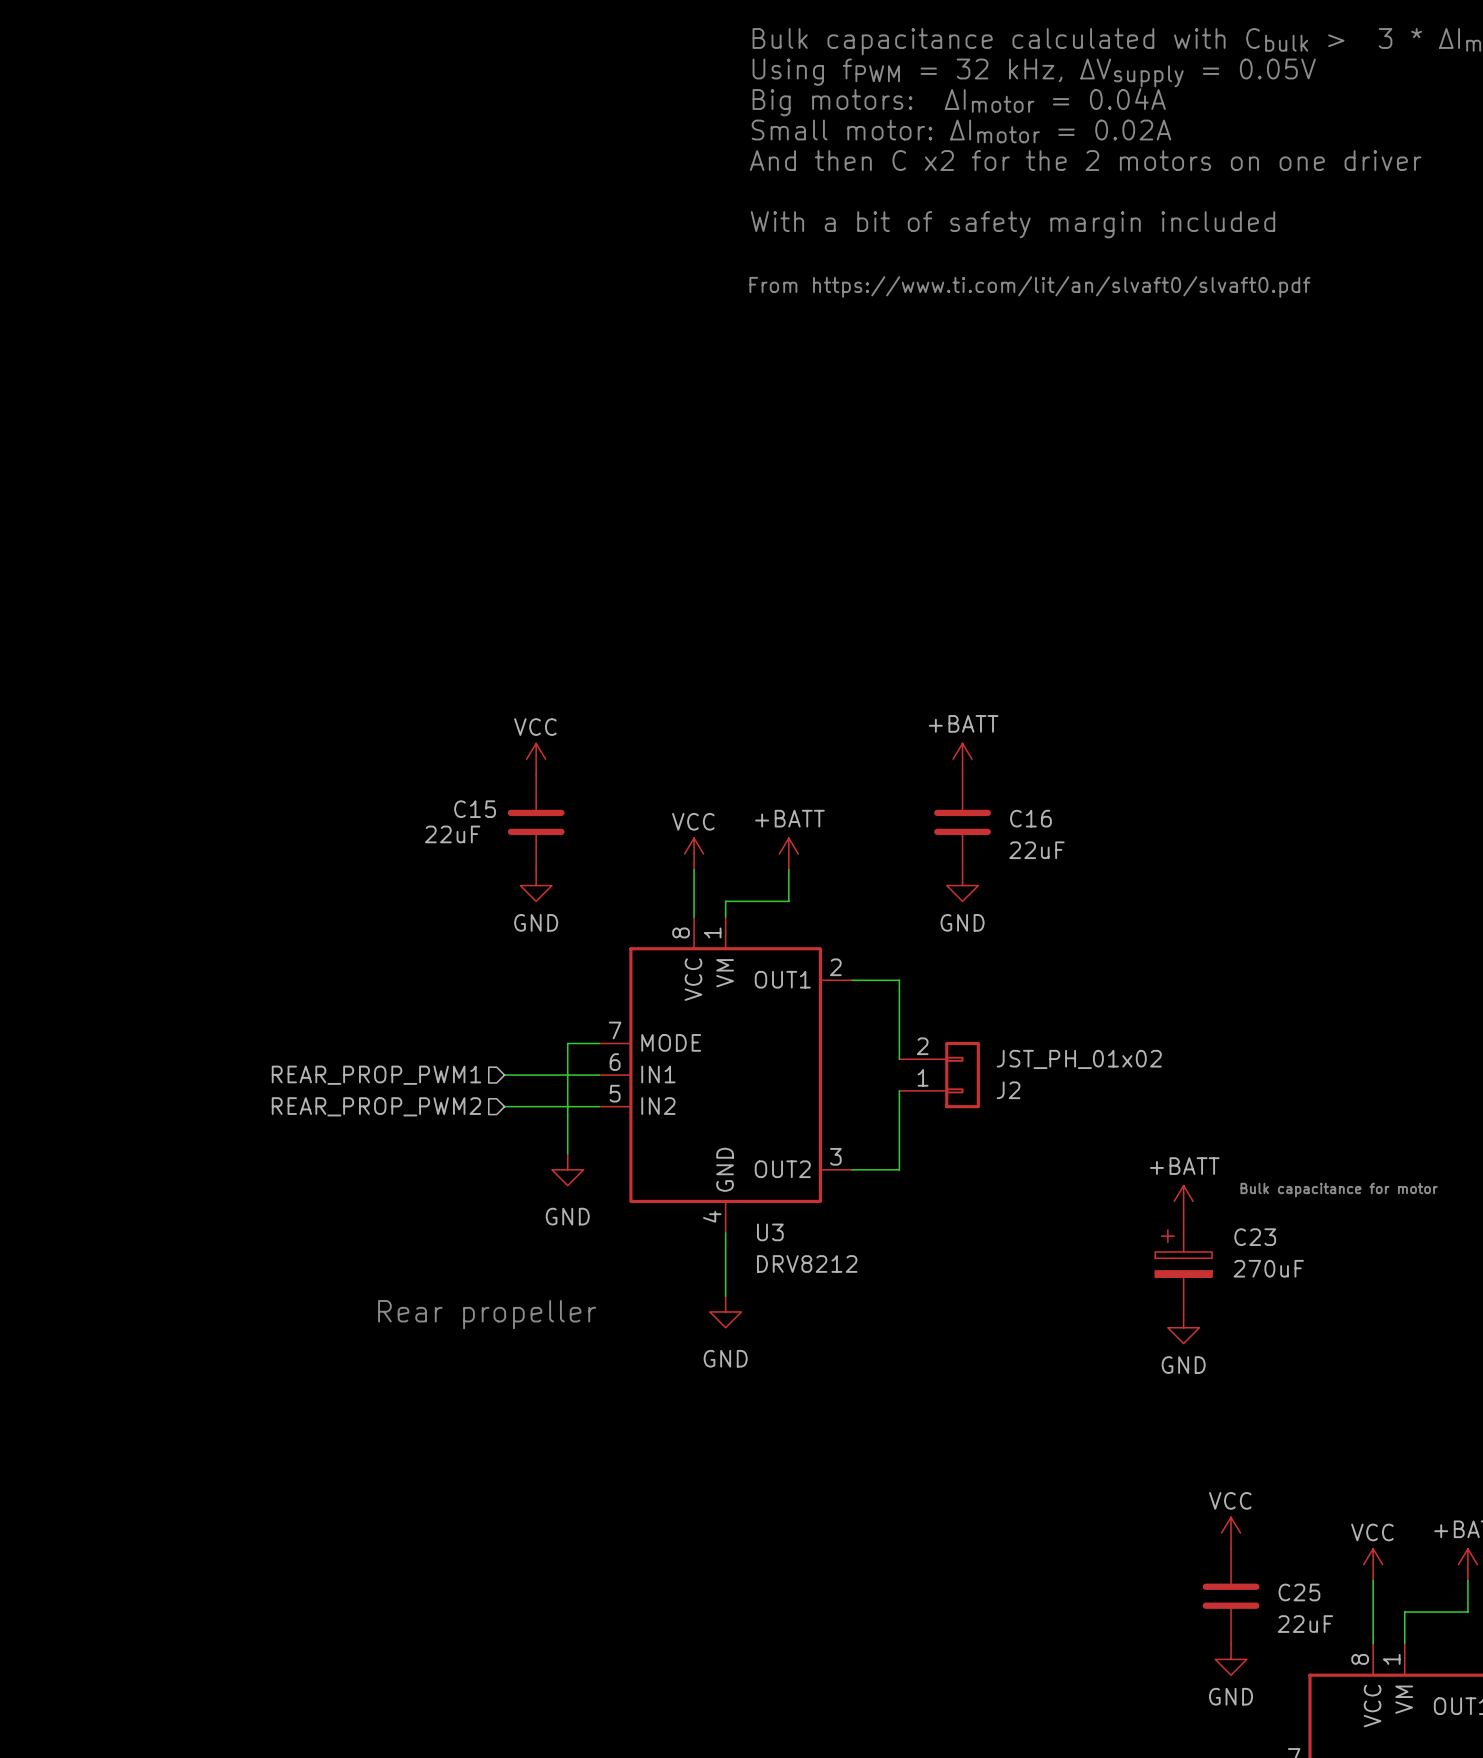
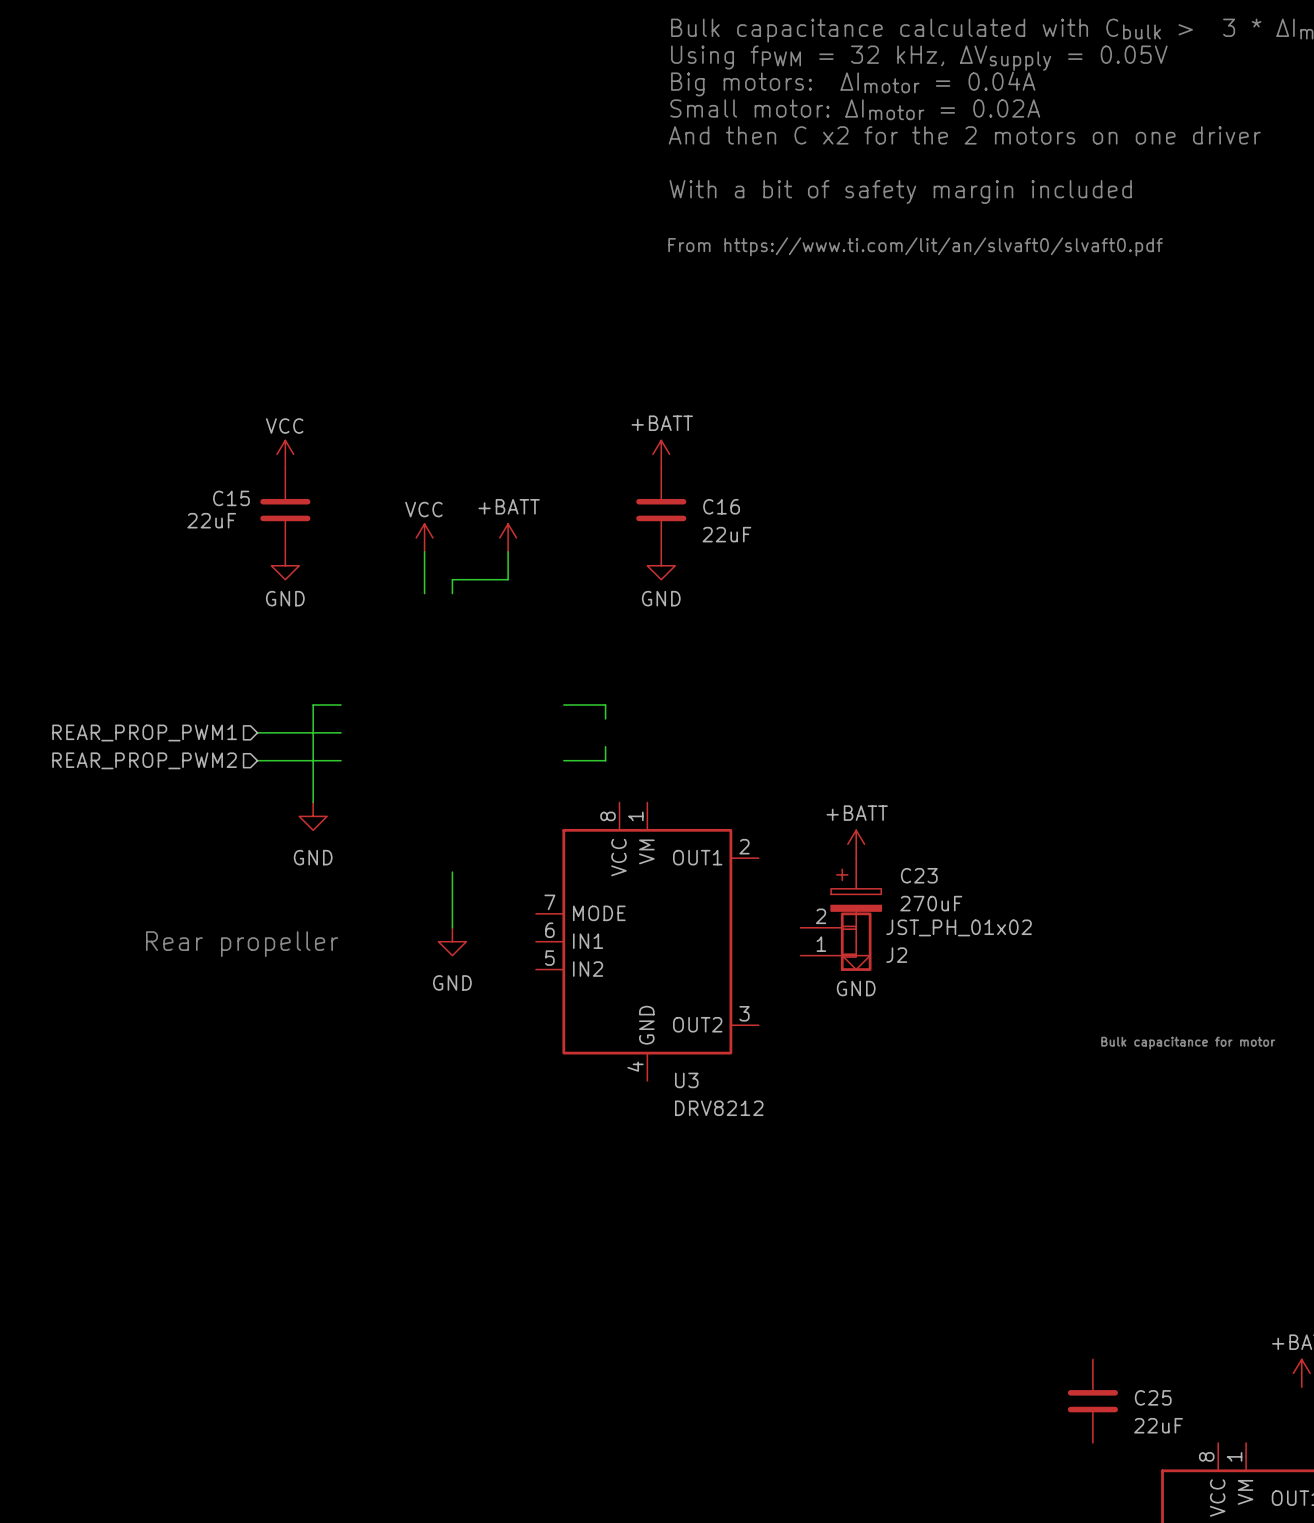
power symbol: none -> VCC (285, 454)
power symbol: none -> +BATT (661, 454)
power symbol: none -> +BATT (508, 537)
wire: none -> (424, 551) (424, 593)
wire: none -> (508, 551) (508, 579) (452, 579) (452, 593)
power symbol: none -> GND (285, 565)
power symbol: none -> GND (661, 565)
power symbol position: VCC (536, 759) -> VCC (424, 537)
power symbol: +BATT (962, 759) -> none
wire: none -> (341, 705) (313, 705) (313, 802)
wire: none -> (563, 705) (605, 705) (605, 718)
C15 position: (536, 822) -> (285, 510)
C16 position: (962, 822) -> (661, 510)
hierarchical label: none -> REAR_PROP_PWM1 (144, 733)
wire: none -> (257, 732) (341, 732)
wire: none -> (605, 746) (605, 760) (563, 760)
power symbol: VCC (694, 853) -> none
power symbol: +BATT (788, 853) -> none
hierarchical label: none -> REAR_PROP_PWM2 (144, 760)
wire: (694, 869) (694, 917) -> none
wire: (788, 869) (788, 901) (725, 901) (725, 917) -> none
power symbol: GND (536, 885) -> none
power symbol: GND (962, 885) -> none
power symbol: none -> GND (313, 816)
power symbol: none -> +BATT (856, 844)
wire: (852, 980) (899, 980) (899, 1059) -> none
wire: none -> (452, 872) (452, 927)
wire: (599, 1043) (567, 1043) (567, 1154) -> none
hierarchical label: REAR_PROP_PWM1 (376, 1075) -> none
wire: (504, 1075) (599, 1075) -> (257, 760) (341, 760)
power symbol: none -> GND (452, 941)
text: none -> Rear propeller (242, 944)
wire: (899, 1090) (899, 1169) (852, 1169) -> none
power symbol: none -> GND (856, 955)
hierarchical label: REAR_PROP_PWM2 (376, 1106) -> none
wire: (504, 1106) (599, 1106) -> none
power symbol: GND (567, 1169) -> none
power symbol: +BATT (1183, 1201) -> none
wire: (725, 1233) (725, 1296) -> none
C23 position: (1183, 1264) -> (856, 899)
power symbol: GND (725, 1311) -> none
text: Rear propeller (487, 1314) -> none
power symbol: GND (1183, 1327) -> none
power symbol: VCC (1231, 1533) -> none
power symbol: VCC (1373, 1564) -> none
wire: (1373, 1580) (1373, 1643) -> none
wire: (1467, 1580) (1467, 1612) (1404, 1612) (1404, 1643) -> none
power symbol: GND (1231, 1659) -> none

